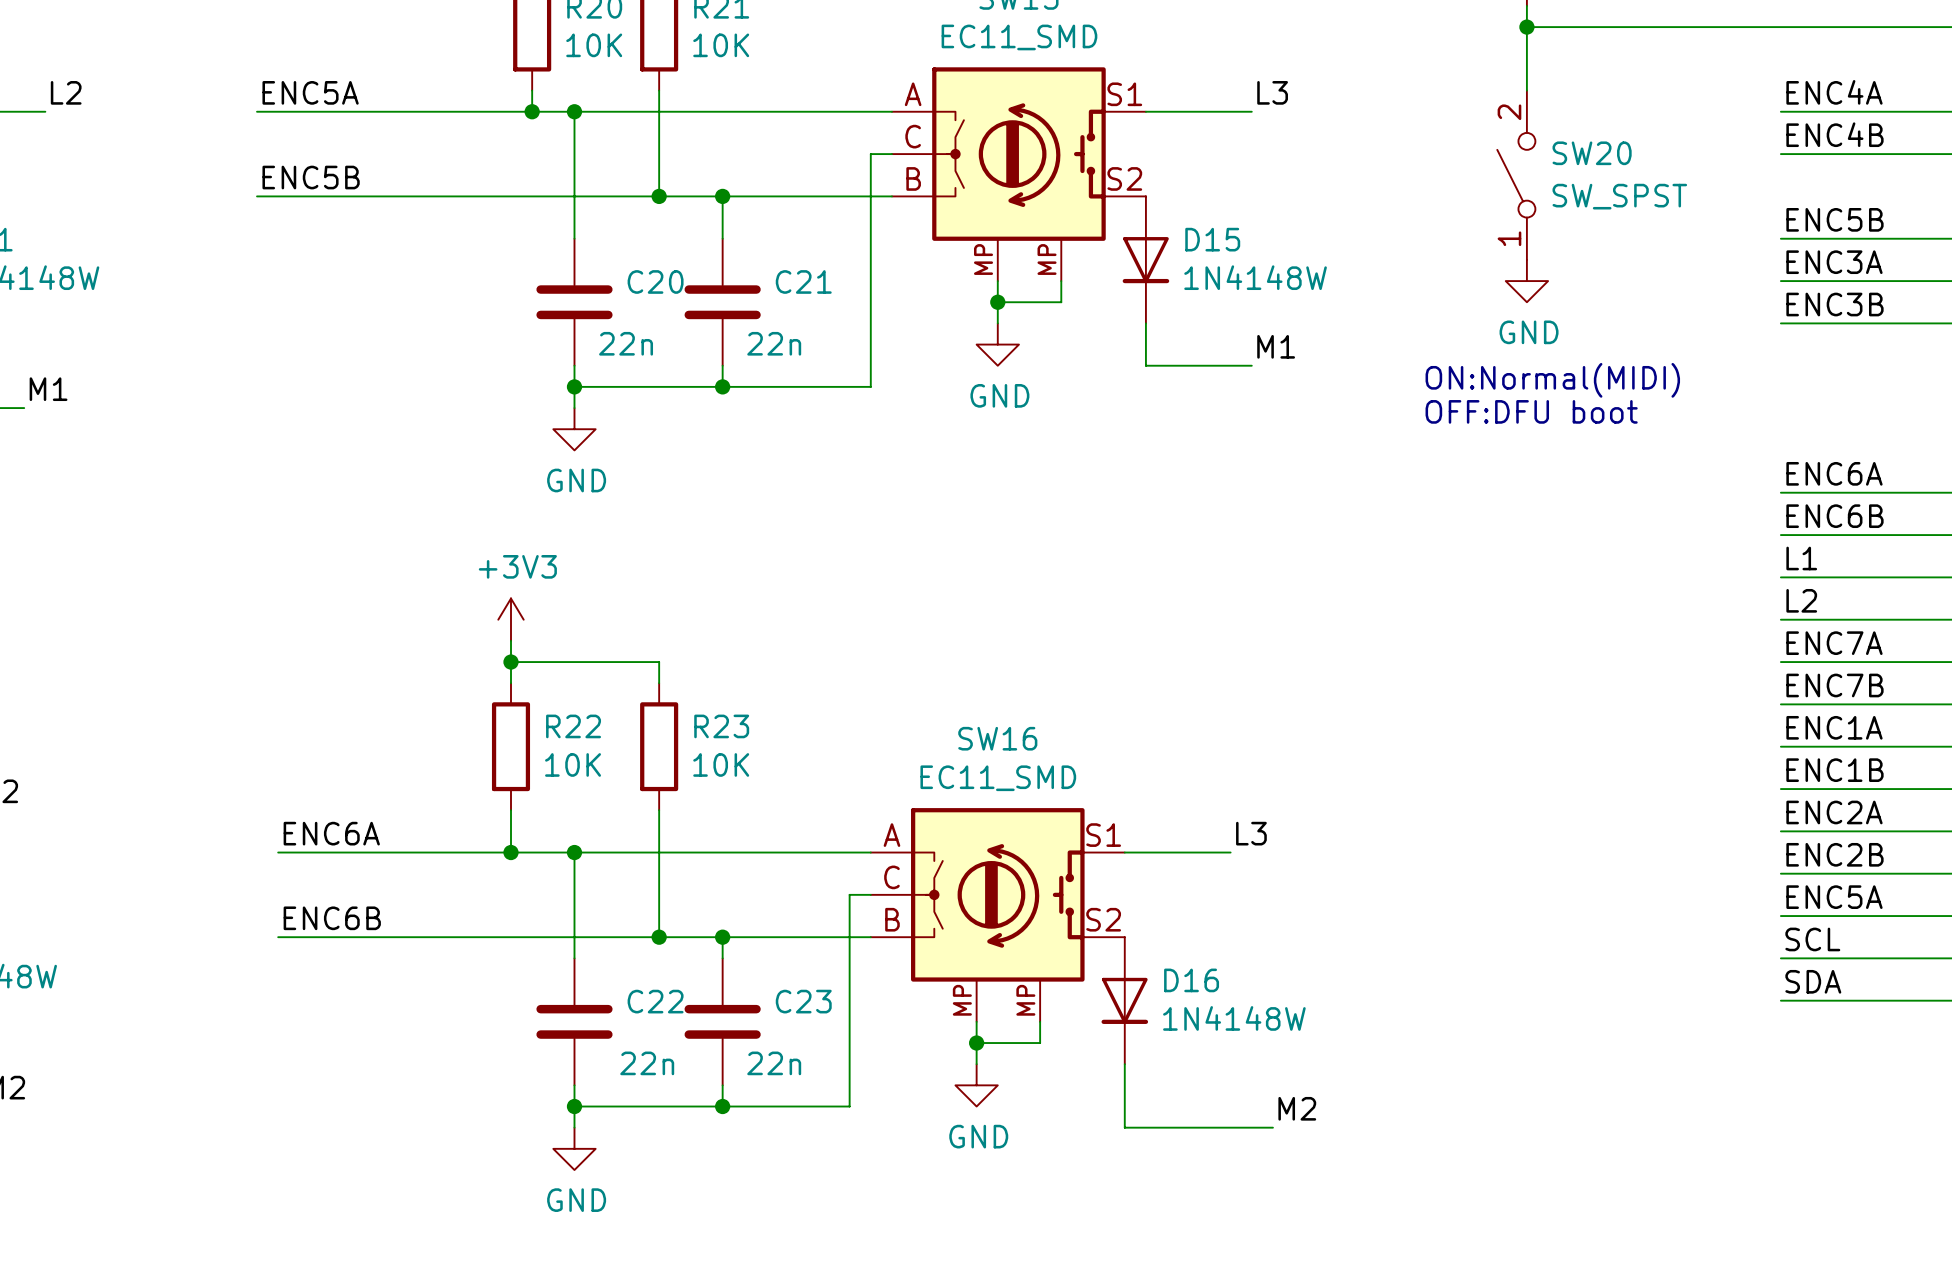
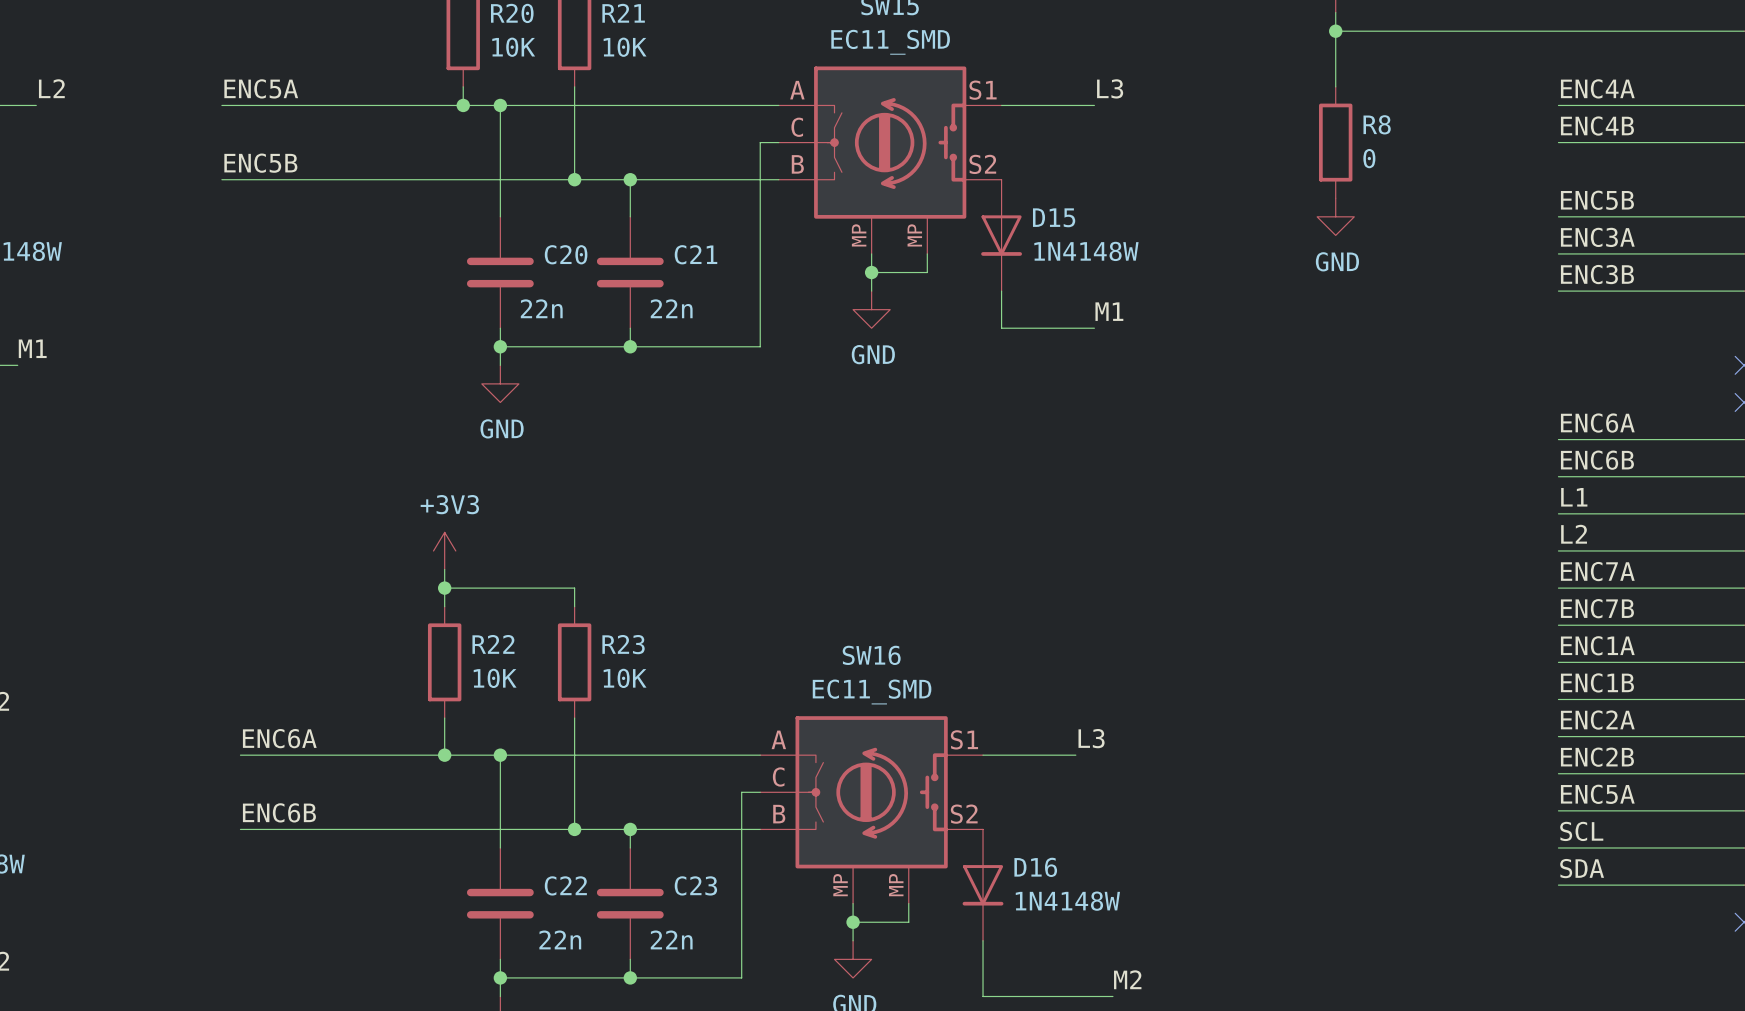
R8: none -> 0 (1335, 142)
SW20: SW_SPST (1516, 175) -> none
power symbol position: GND (1526, 281) -> GND (1335, 216)
text: ON:Normal(MIDI) (1552, 380) -> none
text: OFF:DFU boot (1531, 411) -> none

